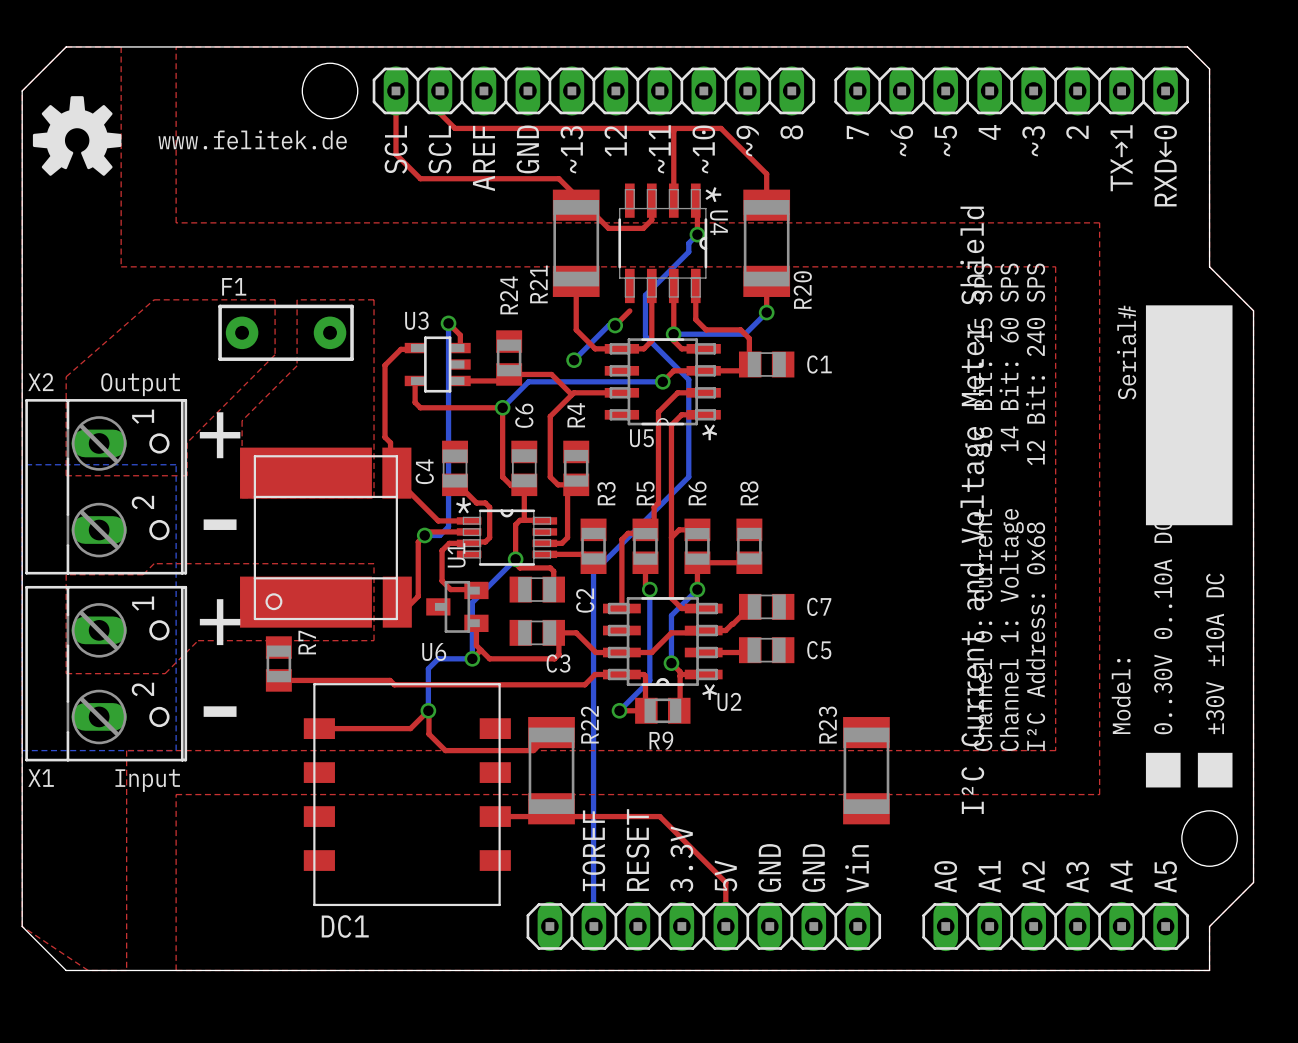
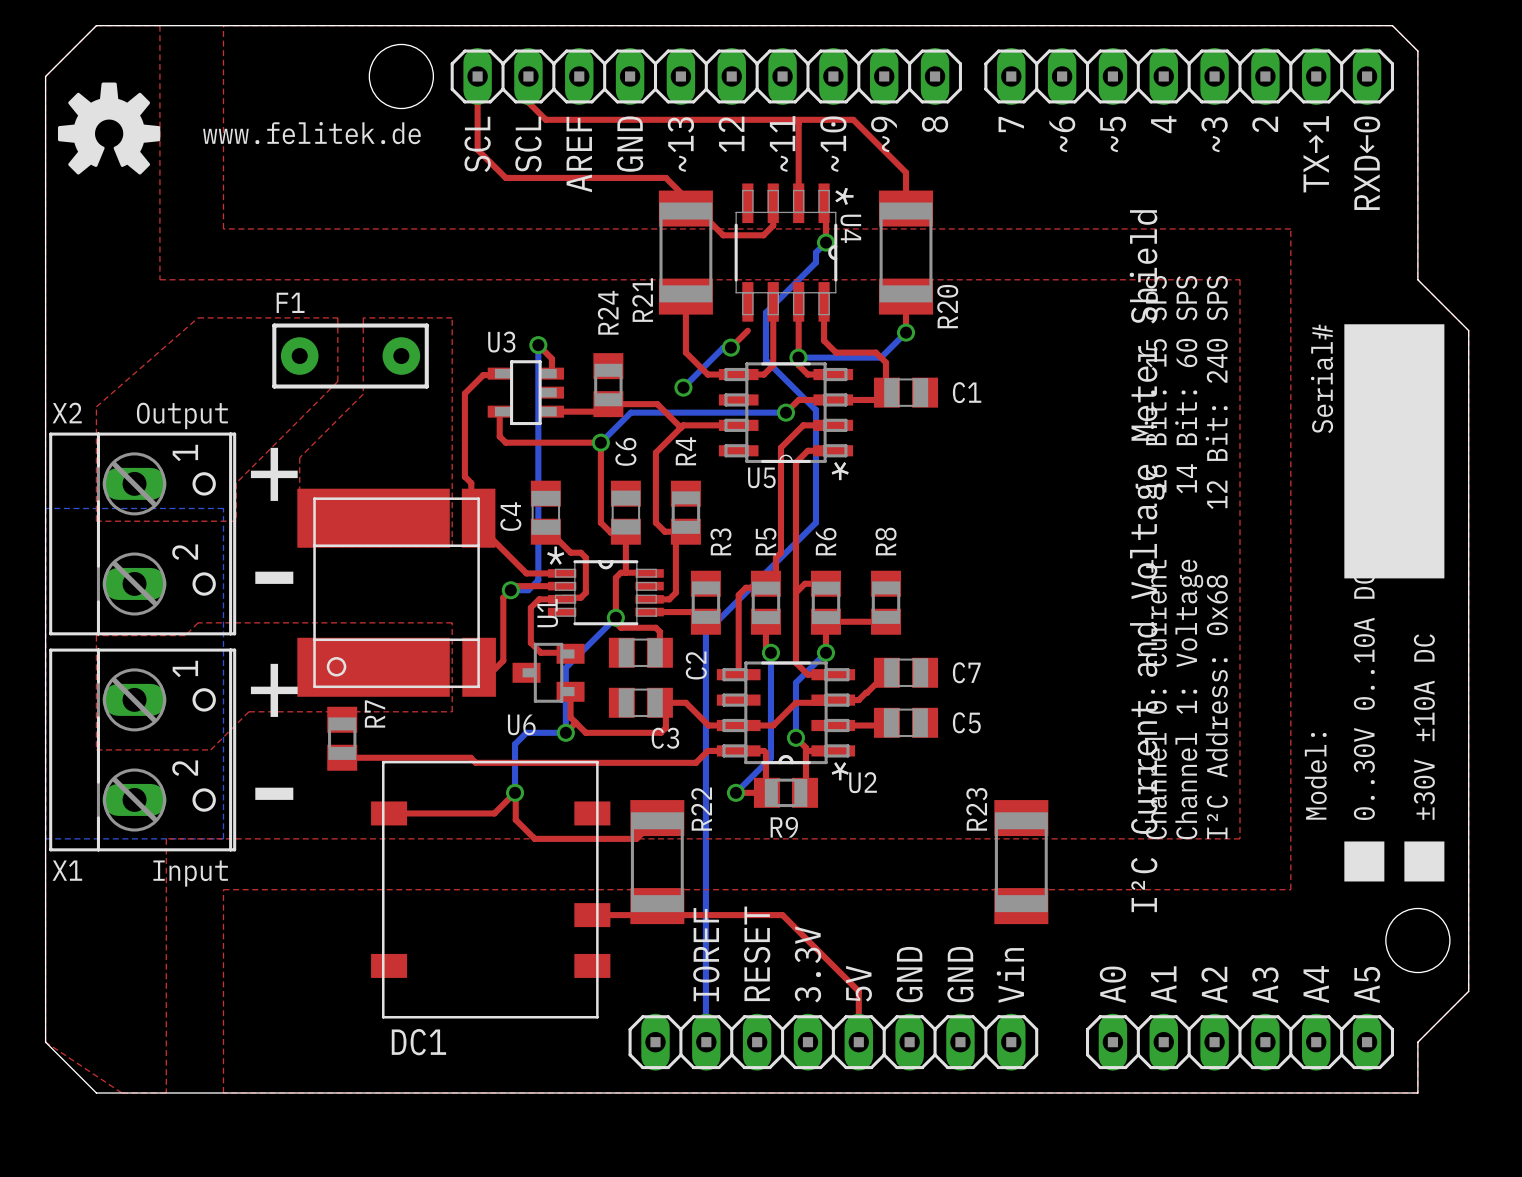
DC1 footprint: [303, 683, 511, 907] -> [371, 760, 611, 1019]

